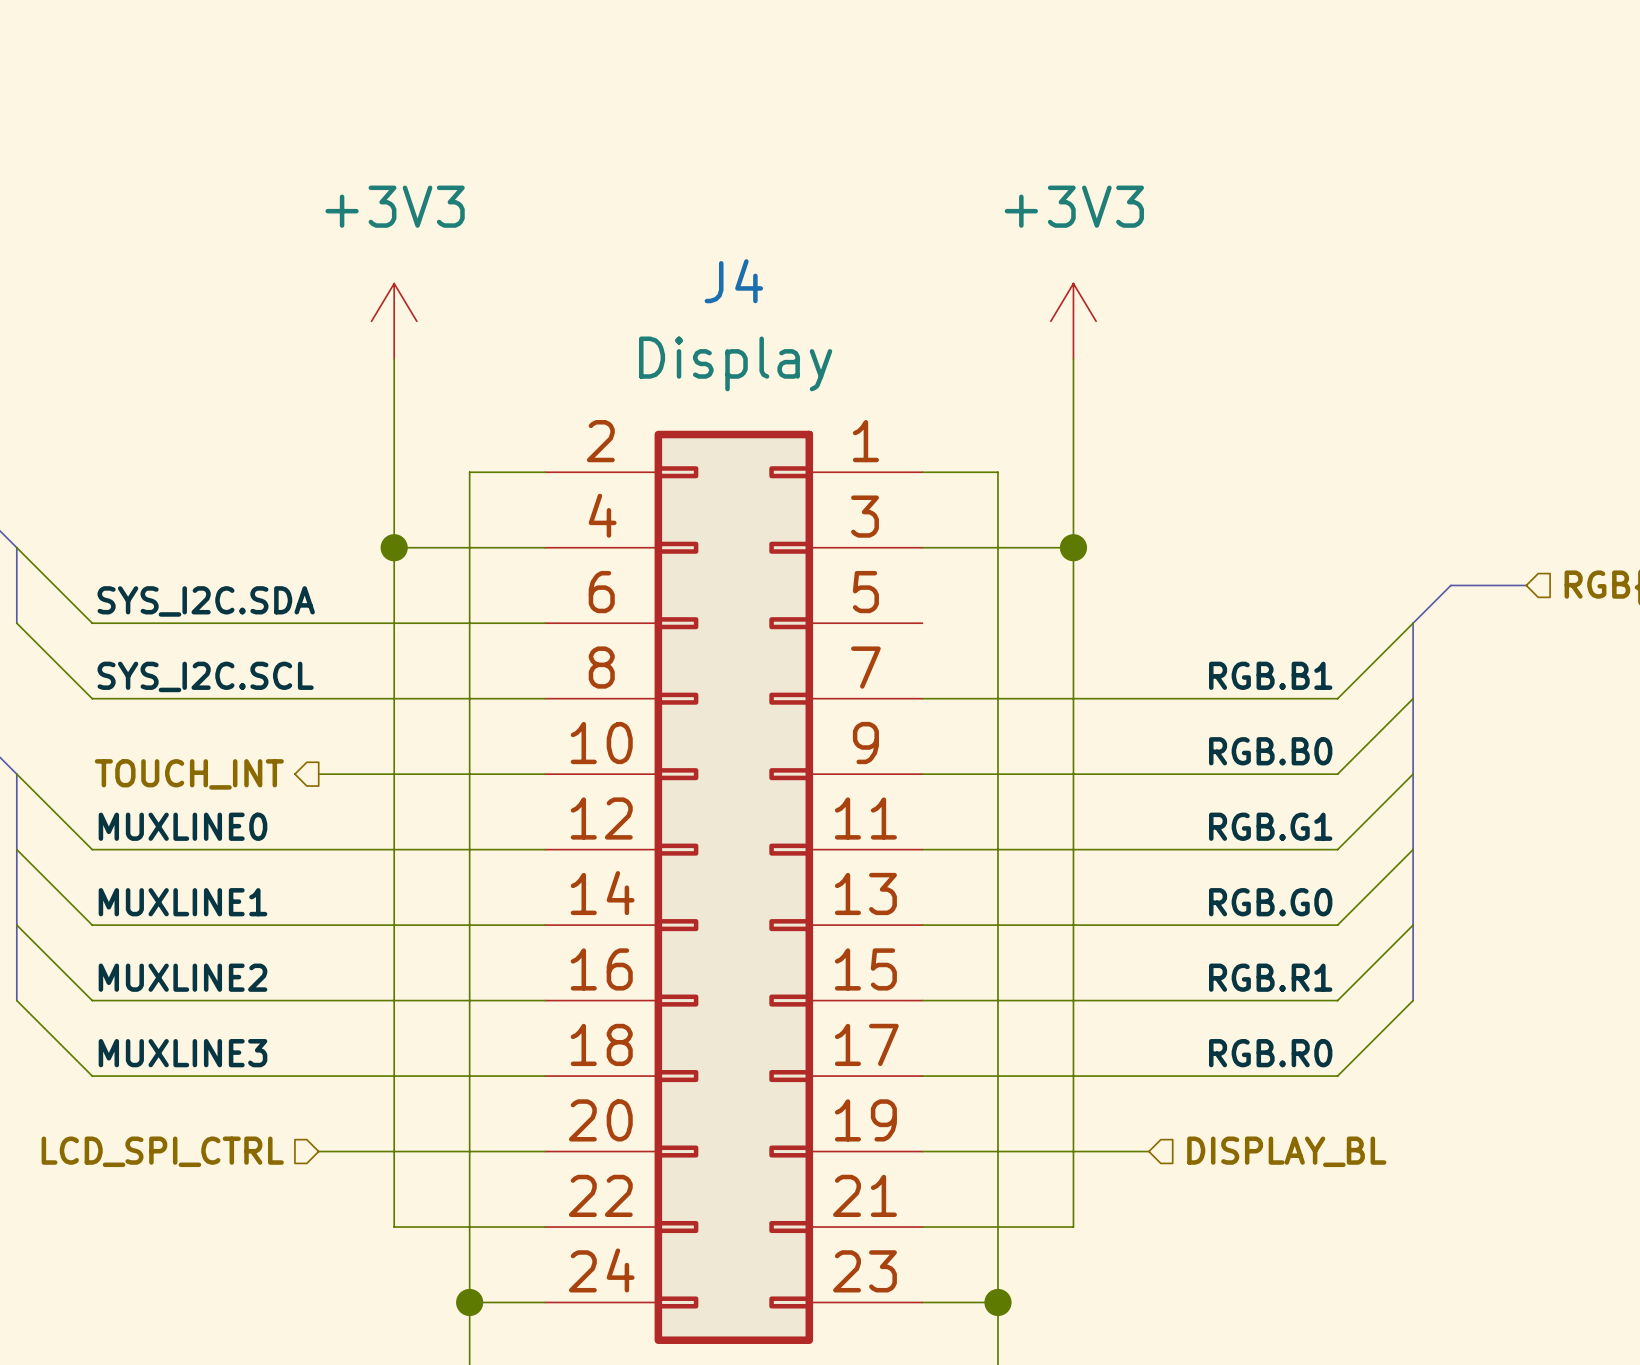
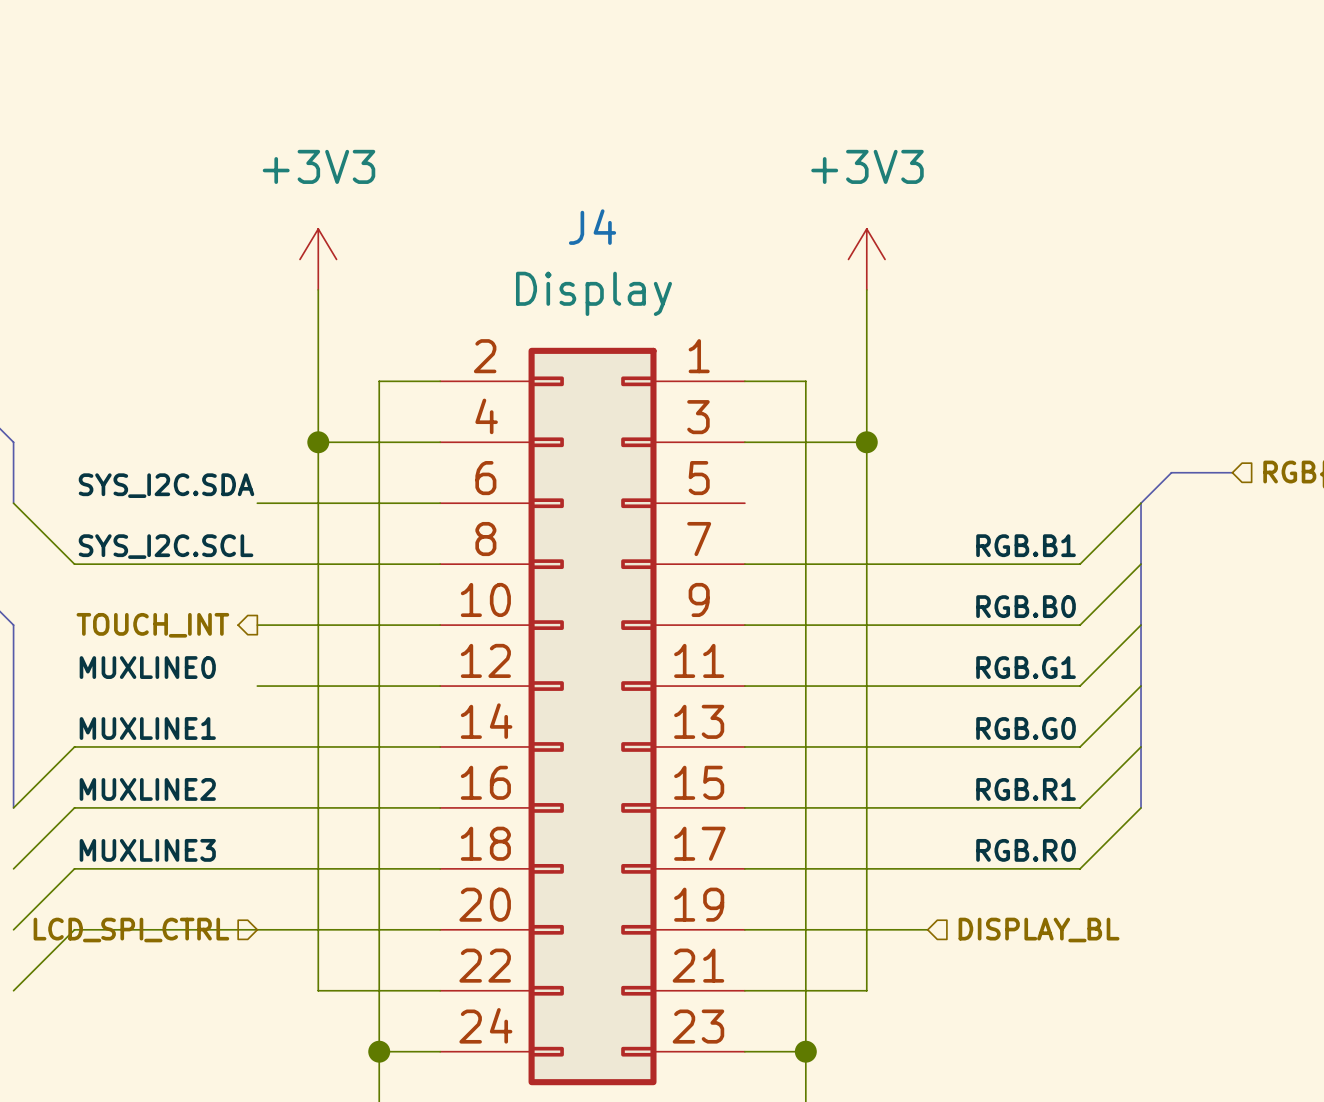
wire: (16, 547) (92, 623) (318, 623) -> none
wire: (16, 774) (92, 849) (318, 849) -> none
wire: (16, 849) (92, 925) -> (13, 807) (74, 746)
wire: (16, 925) (92, 1000) -> (13, 868) (74, 807)
wire: (16, 1000) (92, 1076) -> (13, 929) (74, 868)
wire: none -> (257, 929) (74, 929) (13, 990)

